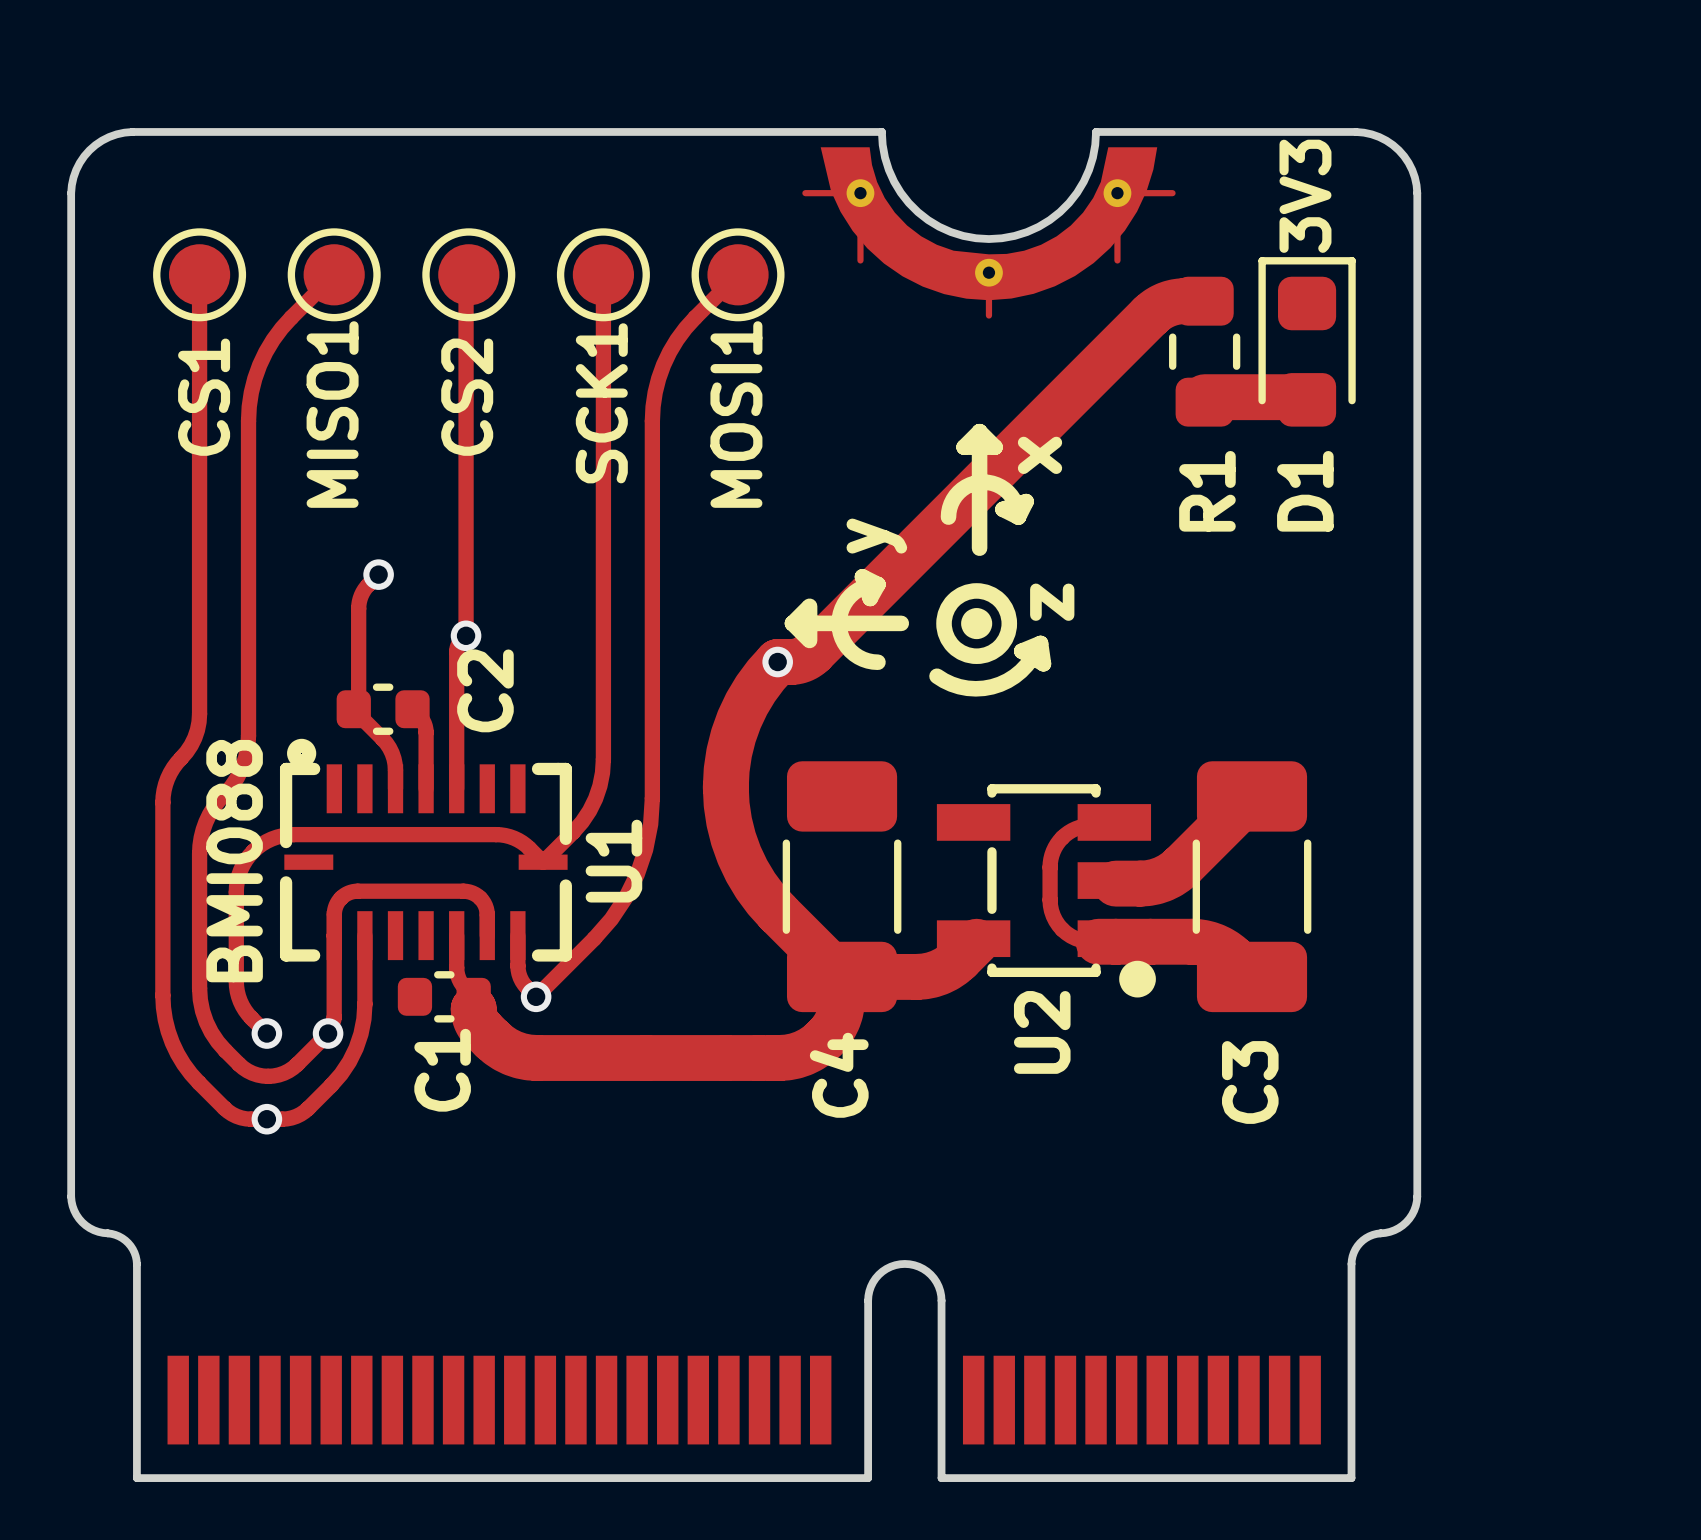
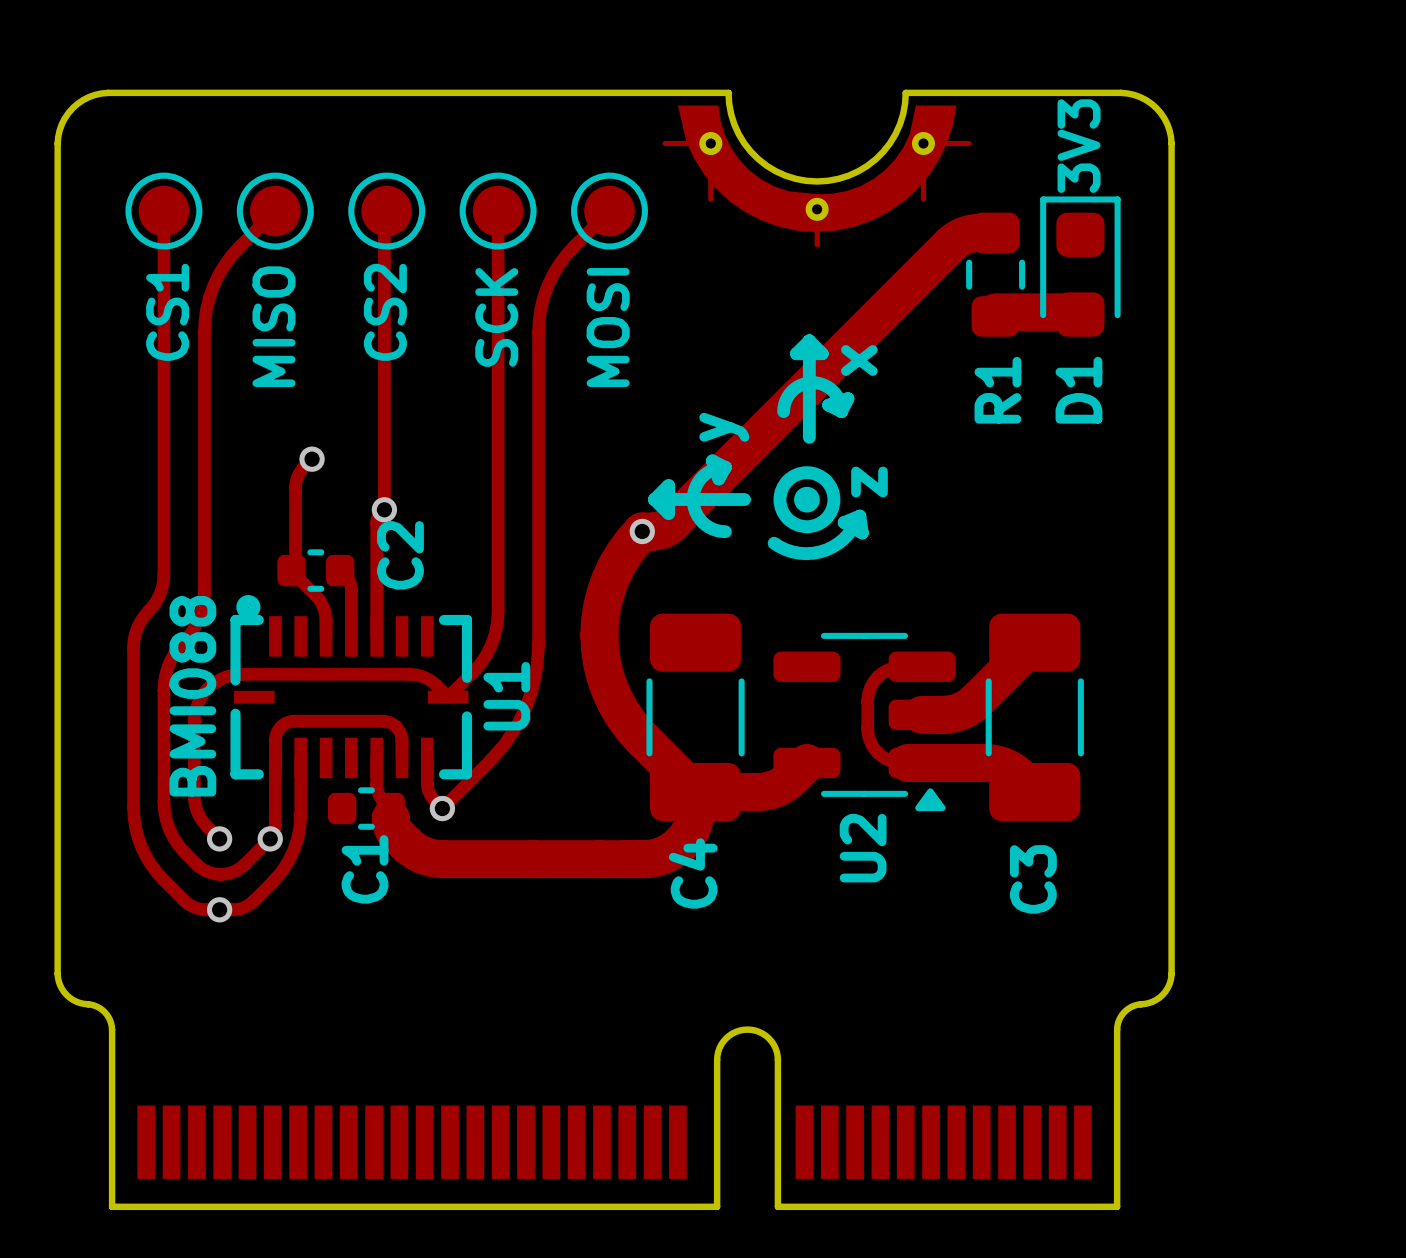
SCK1 name: SCK1 (601, 403) -> SCK (496, 317)
MISO1 name: MISO1 (332, 414) -> MISO (273, 326)
MOSI1 name: MOSI1 (736, 414) -> MOSI (608, 327)
U2 footprint: [936, 784, 1156, 998] -> [773, 632, 956, 812]

